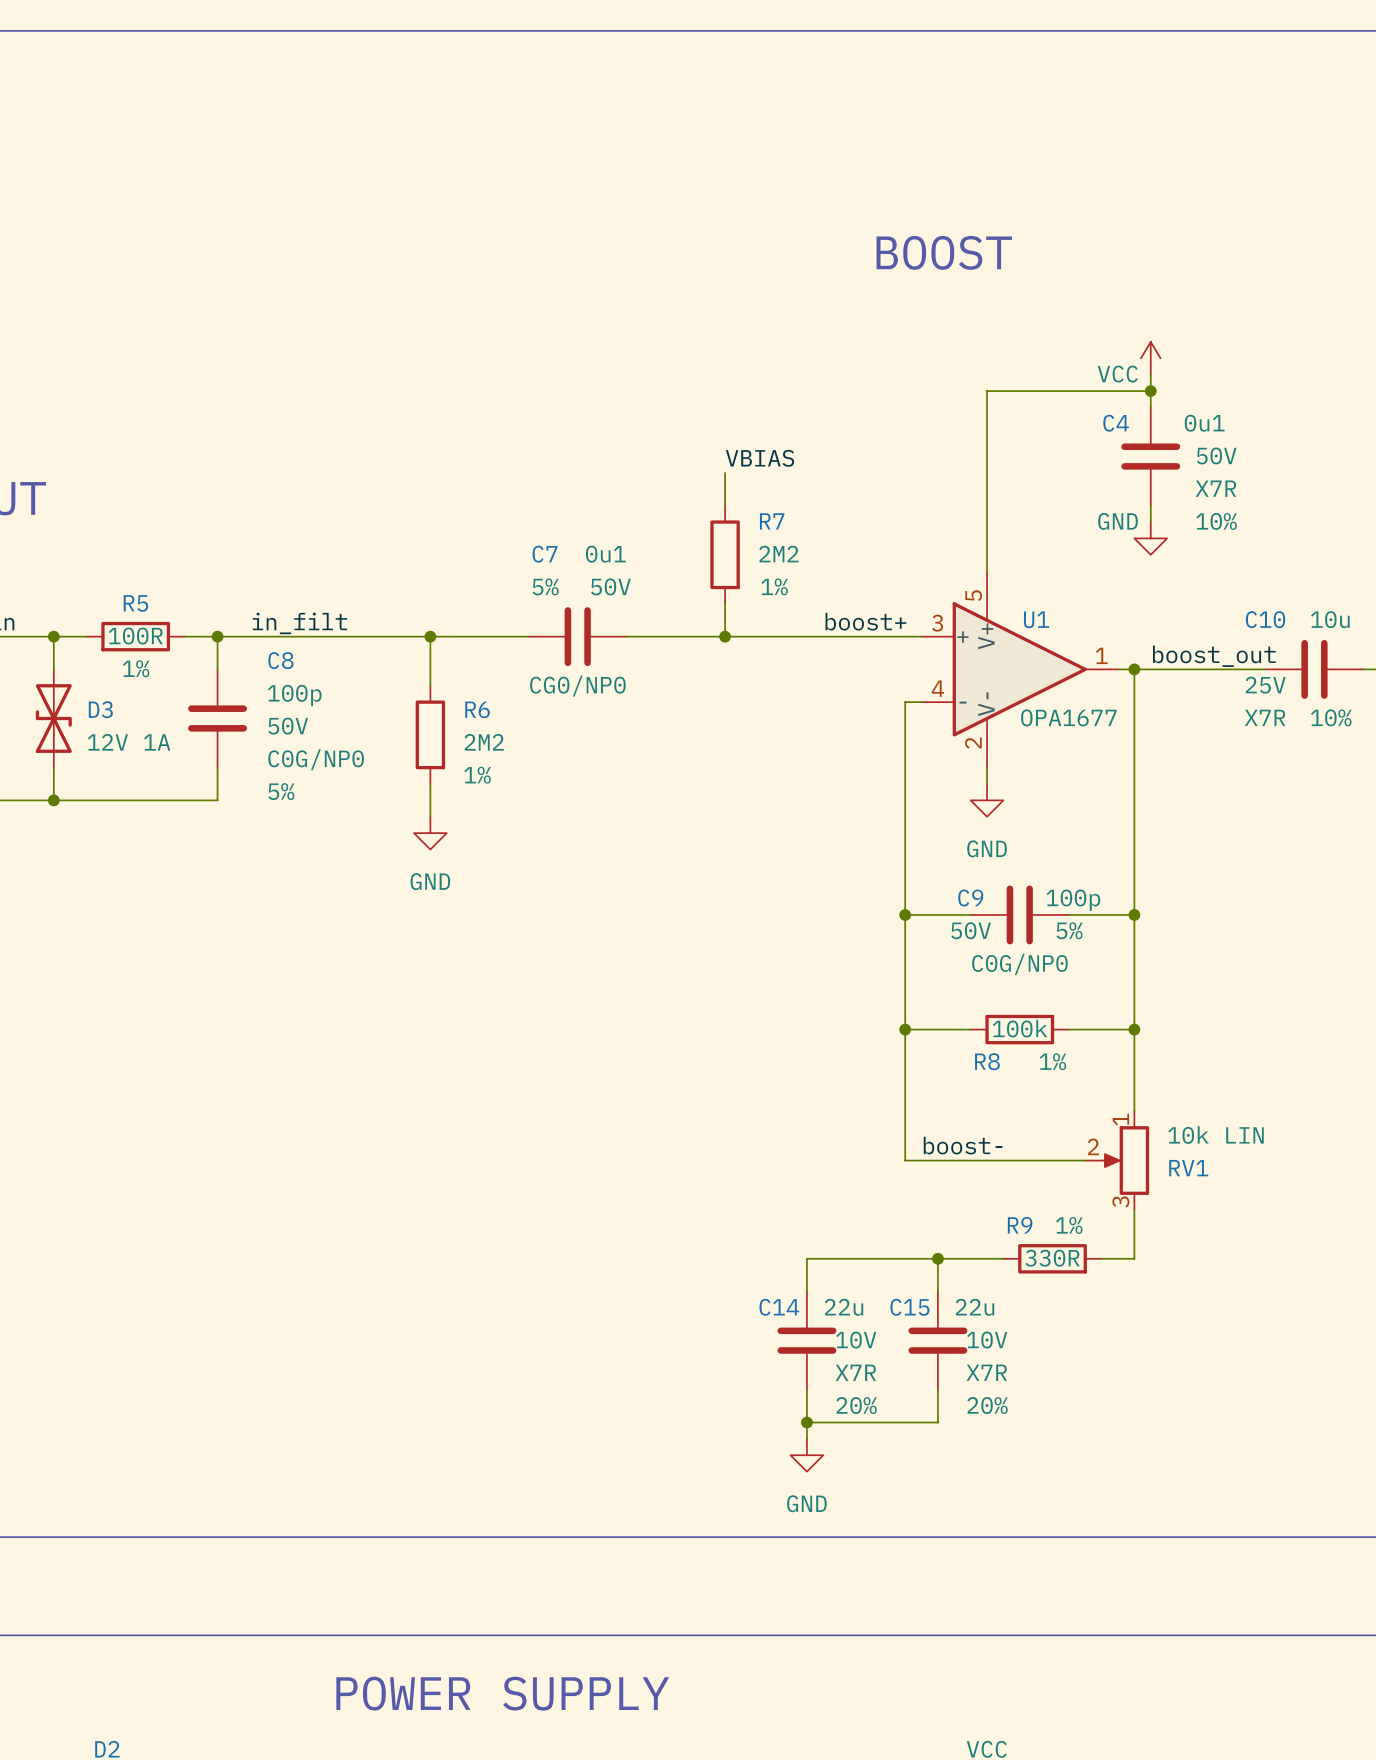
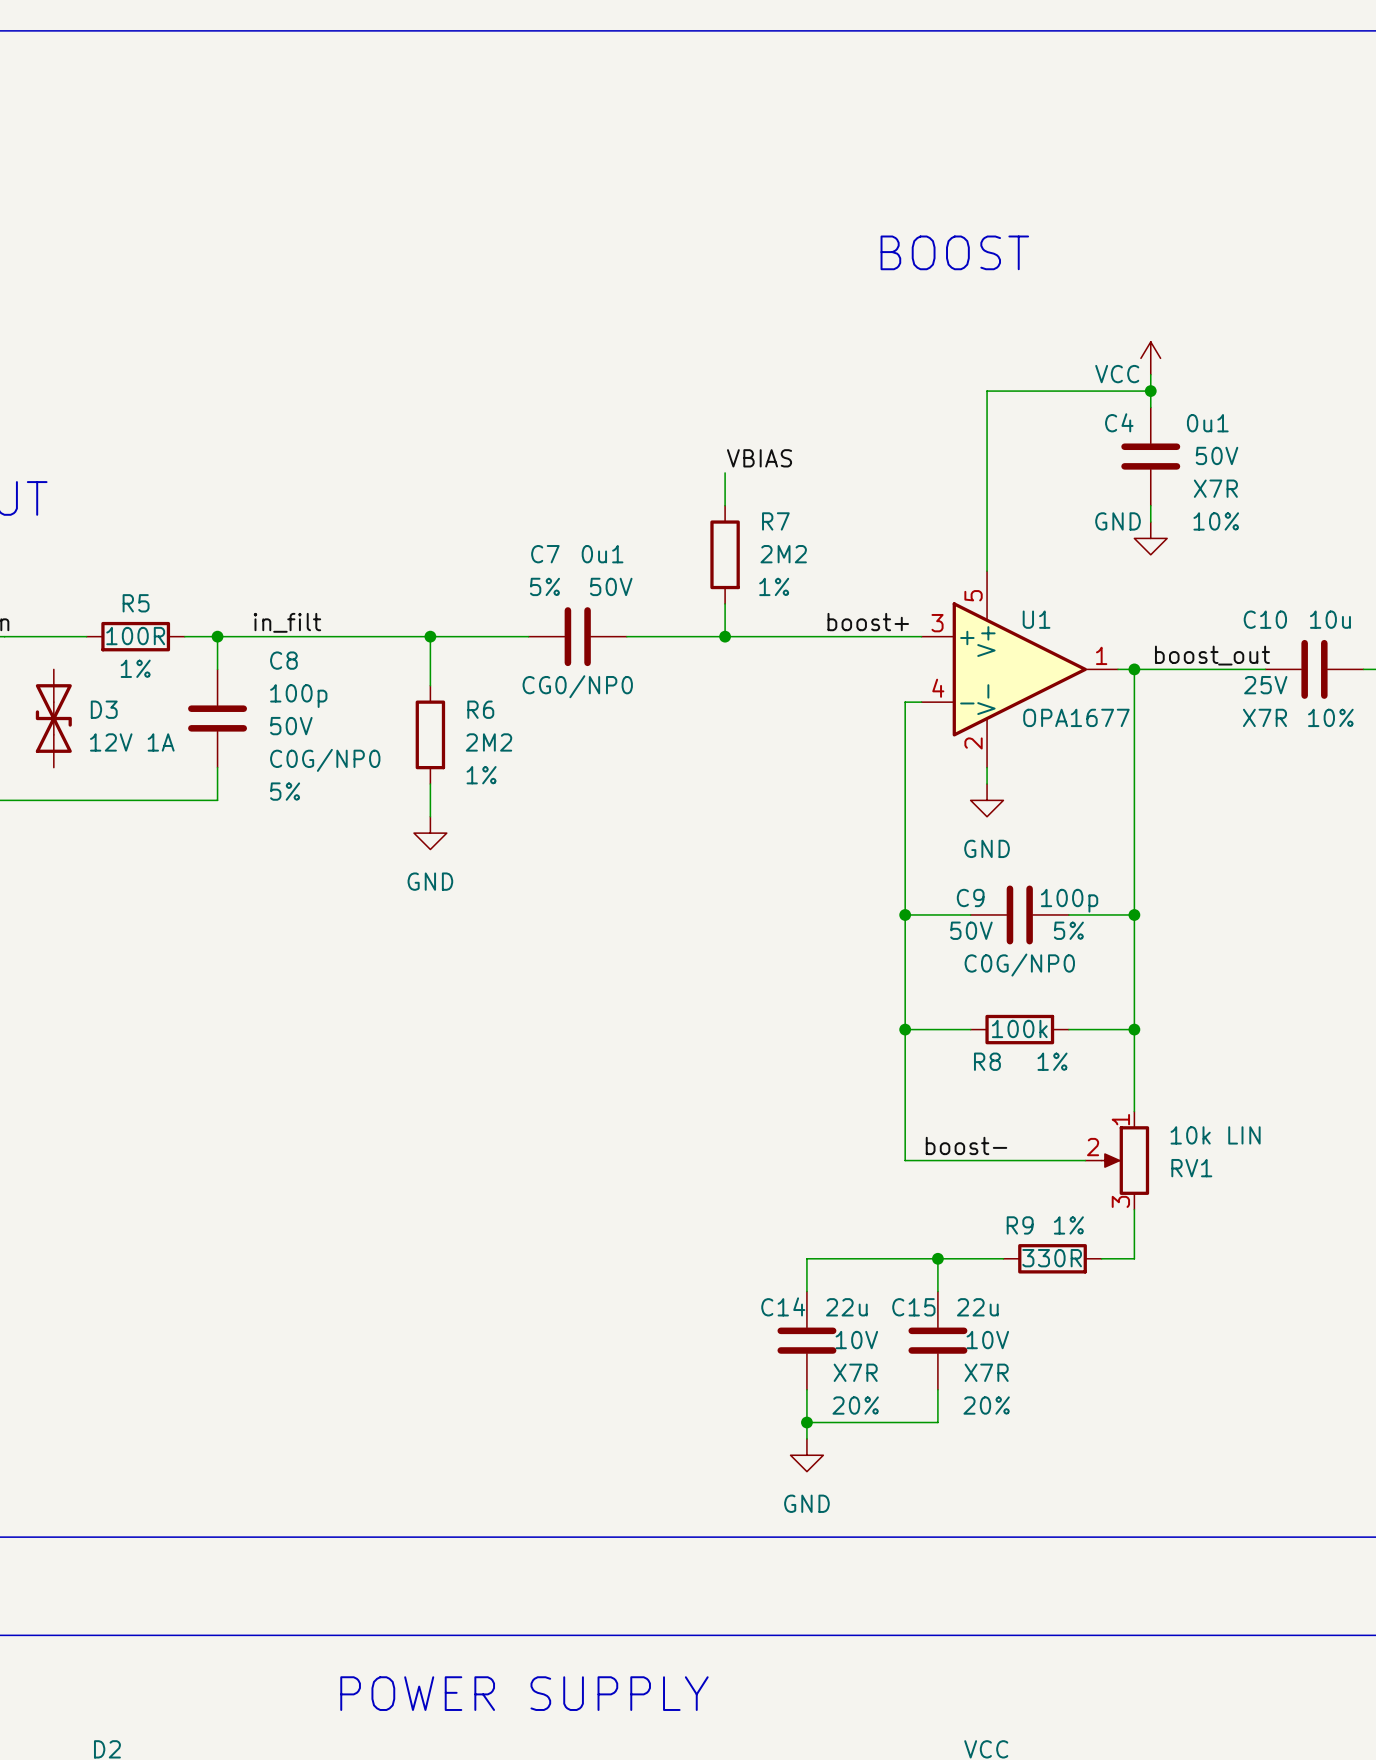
wire: (53, 636) (53, 669) -> none
junction: (53, 636) -> none
wire: (53, 767) (53, 800) -> none
junction: (53, 800) -> none

